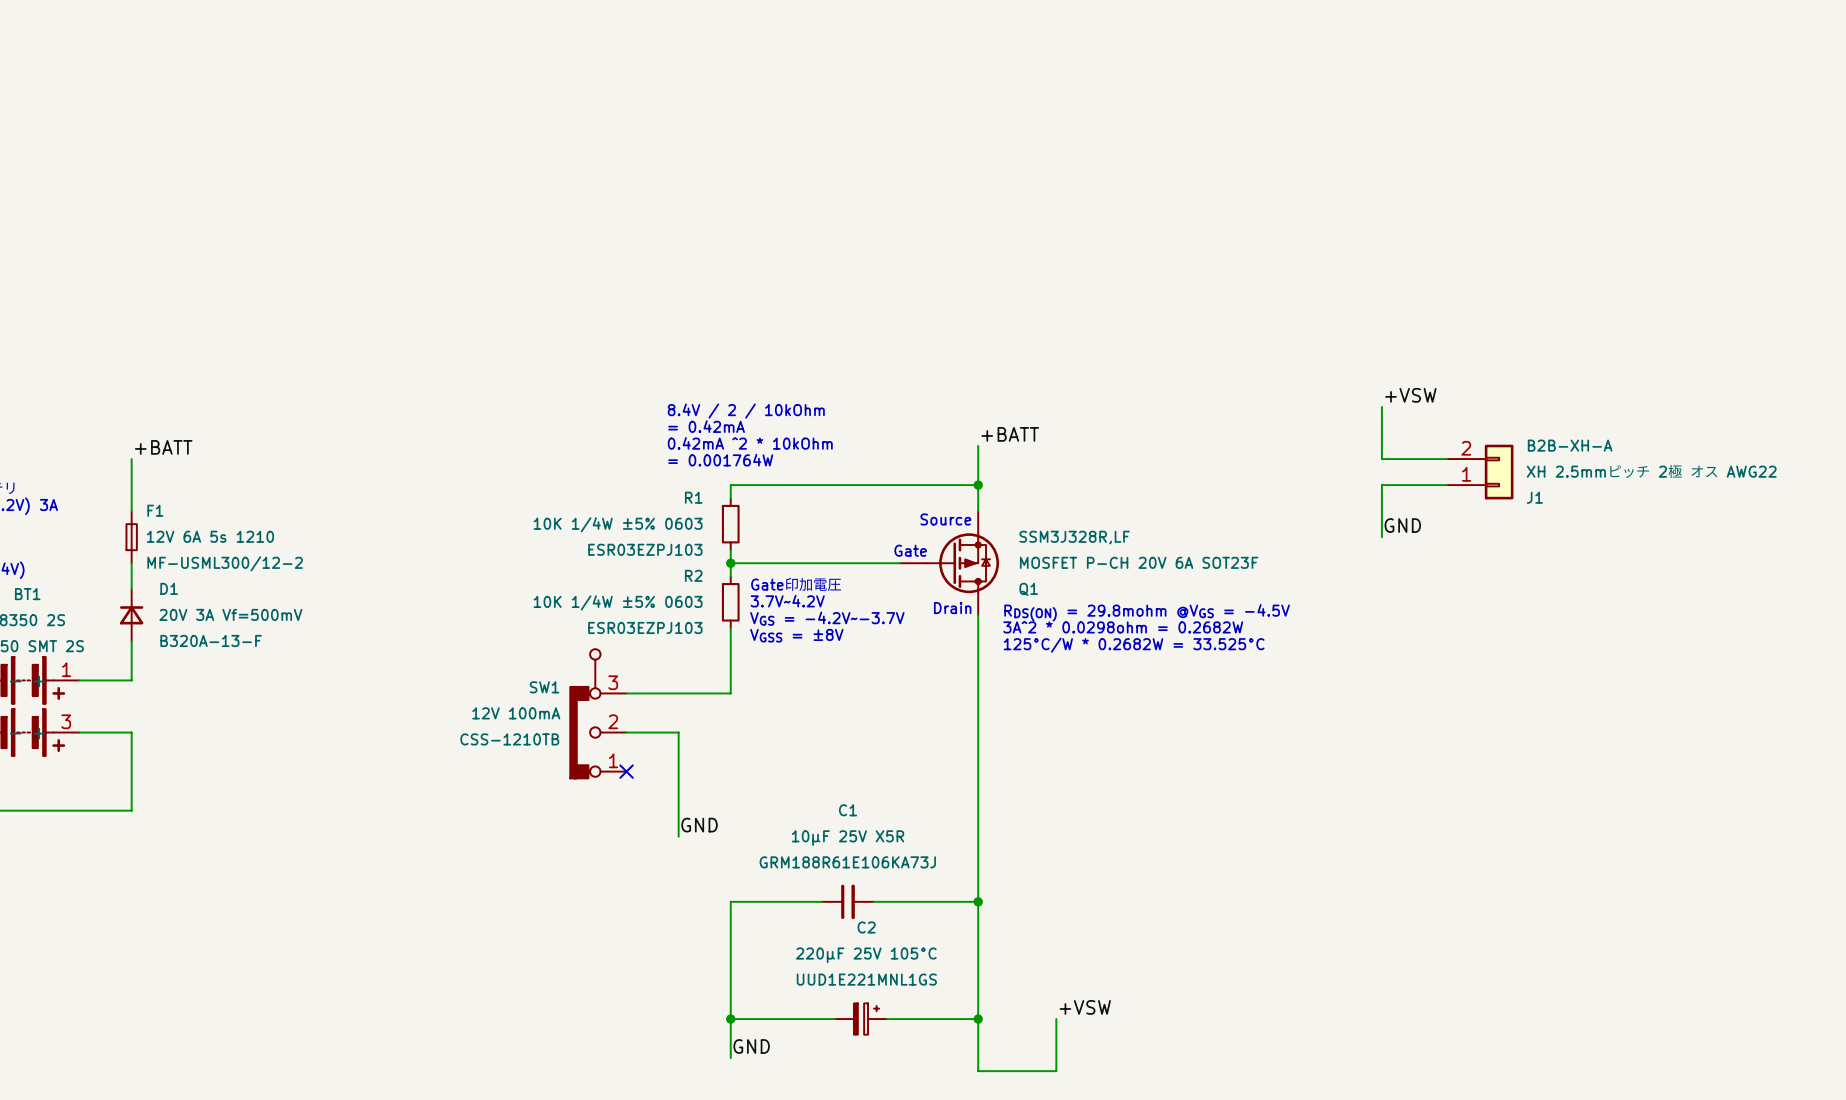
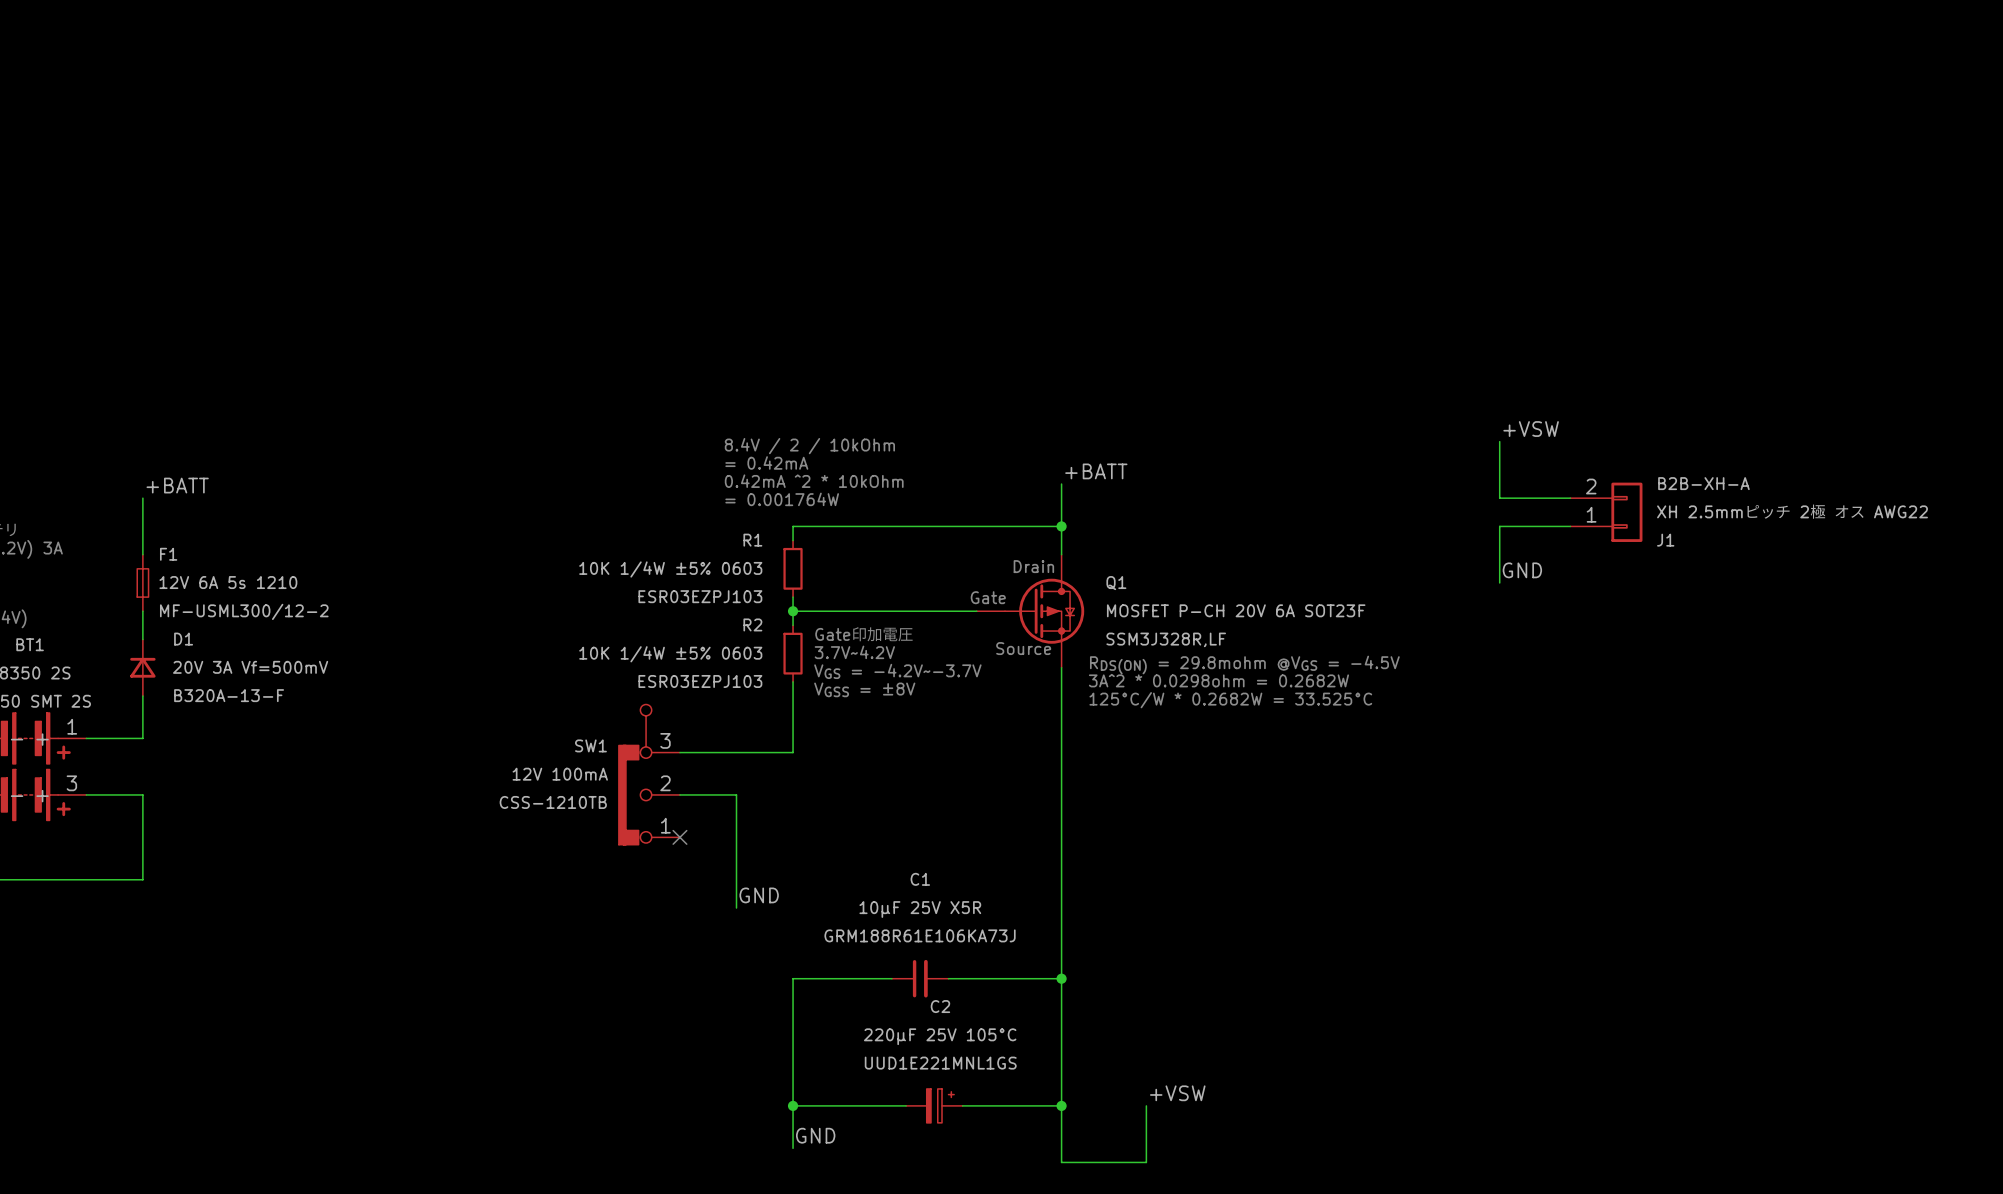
text position: Source (945, 519) -> Source (1023, 648)
Q1 flip: as is (962, 563) -> up-down (1044, 611)
text position: Drain (952, 608) -> Drain (1033, 566)

